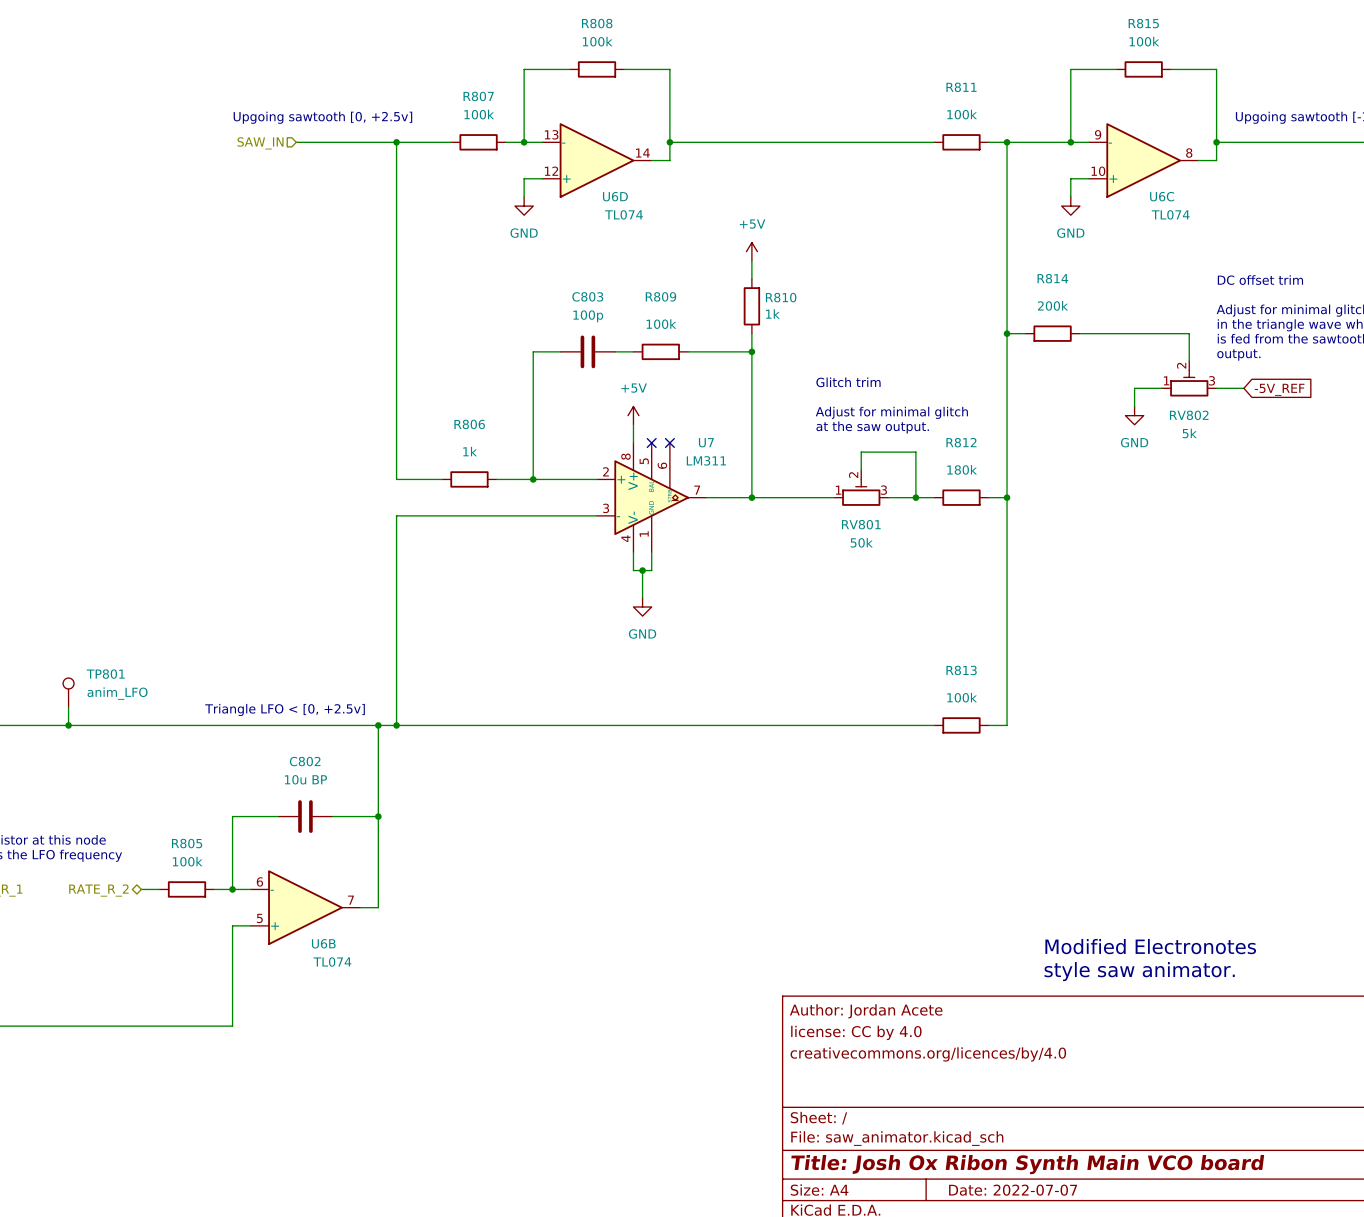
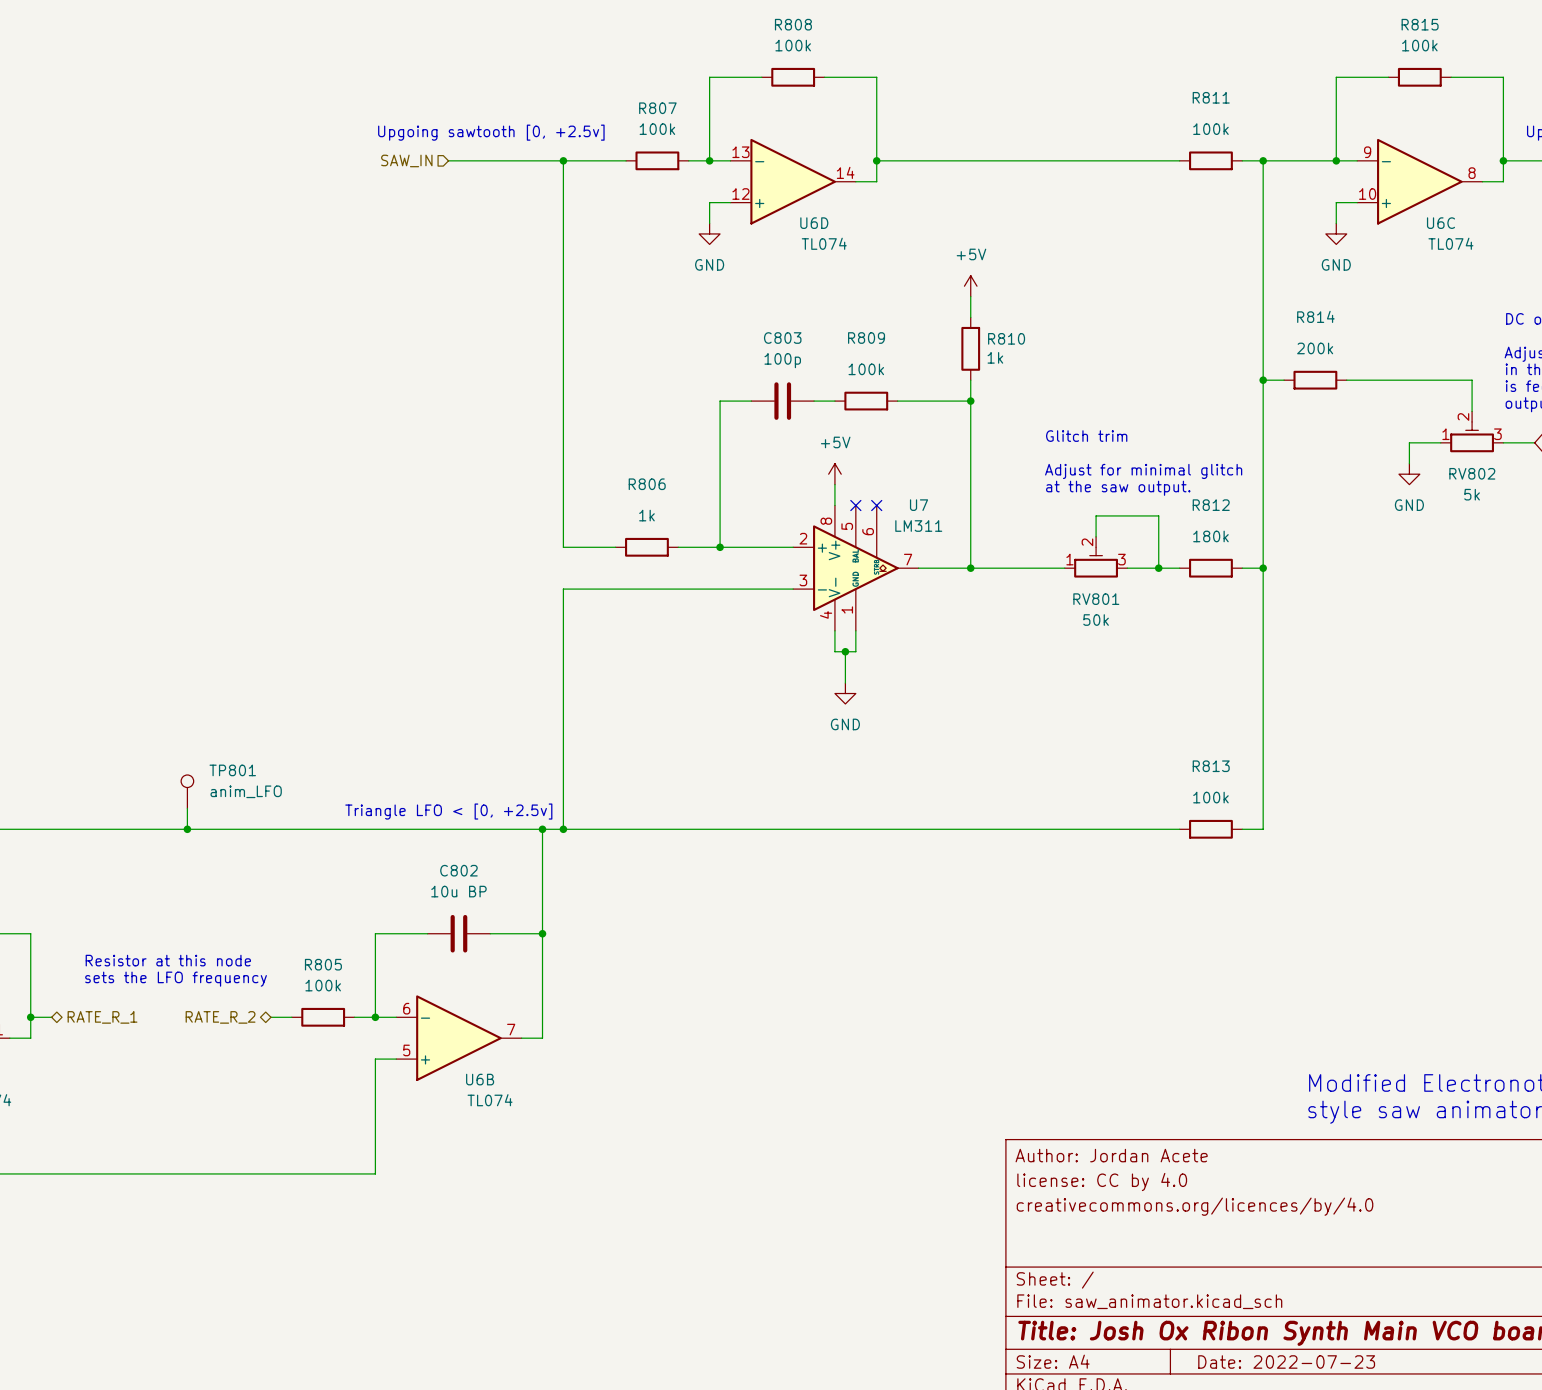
title block: Date: 2022-07-07 (1013, 1190) -> Date: 2022-07-23 (1286, 1362)

